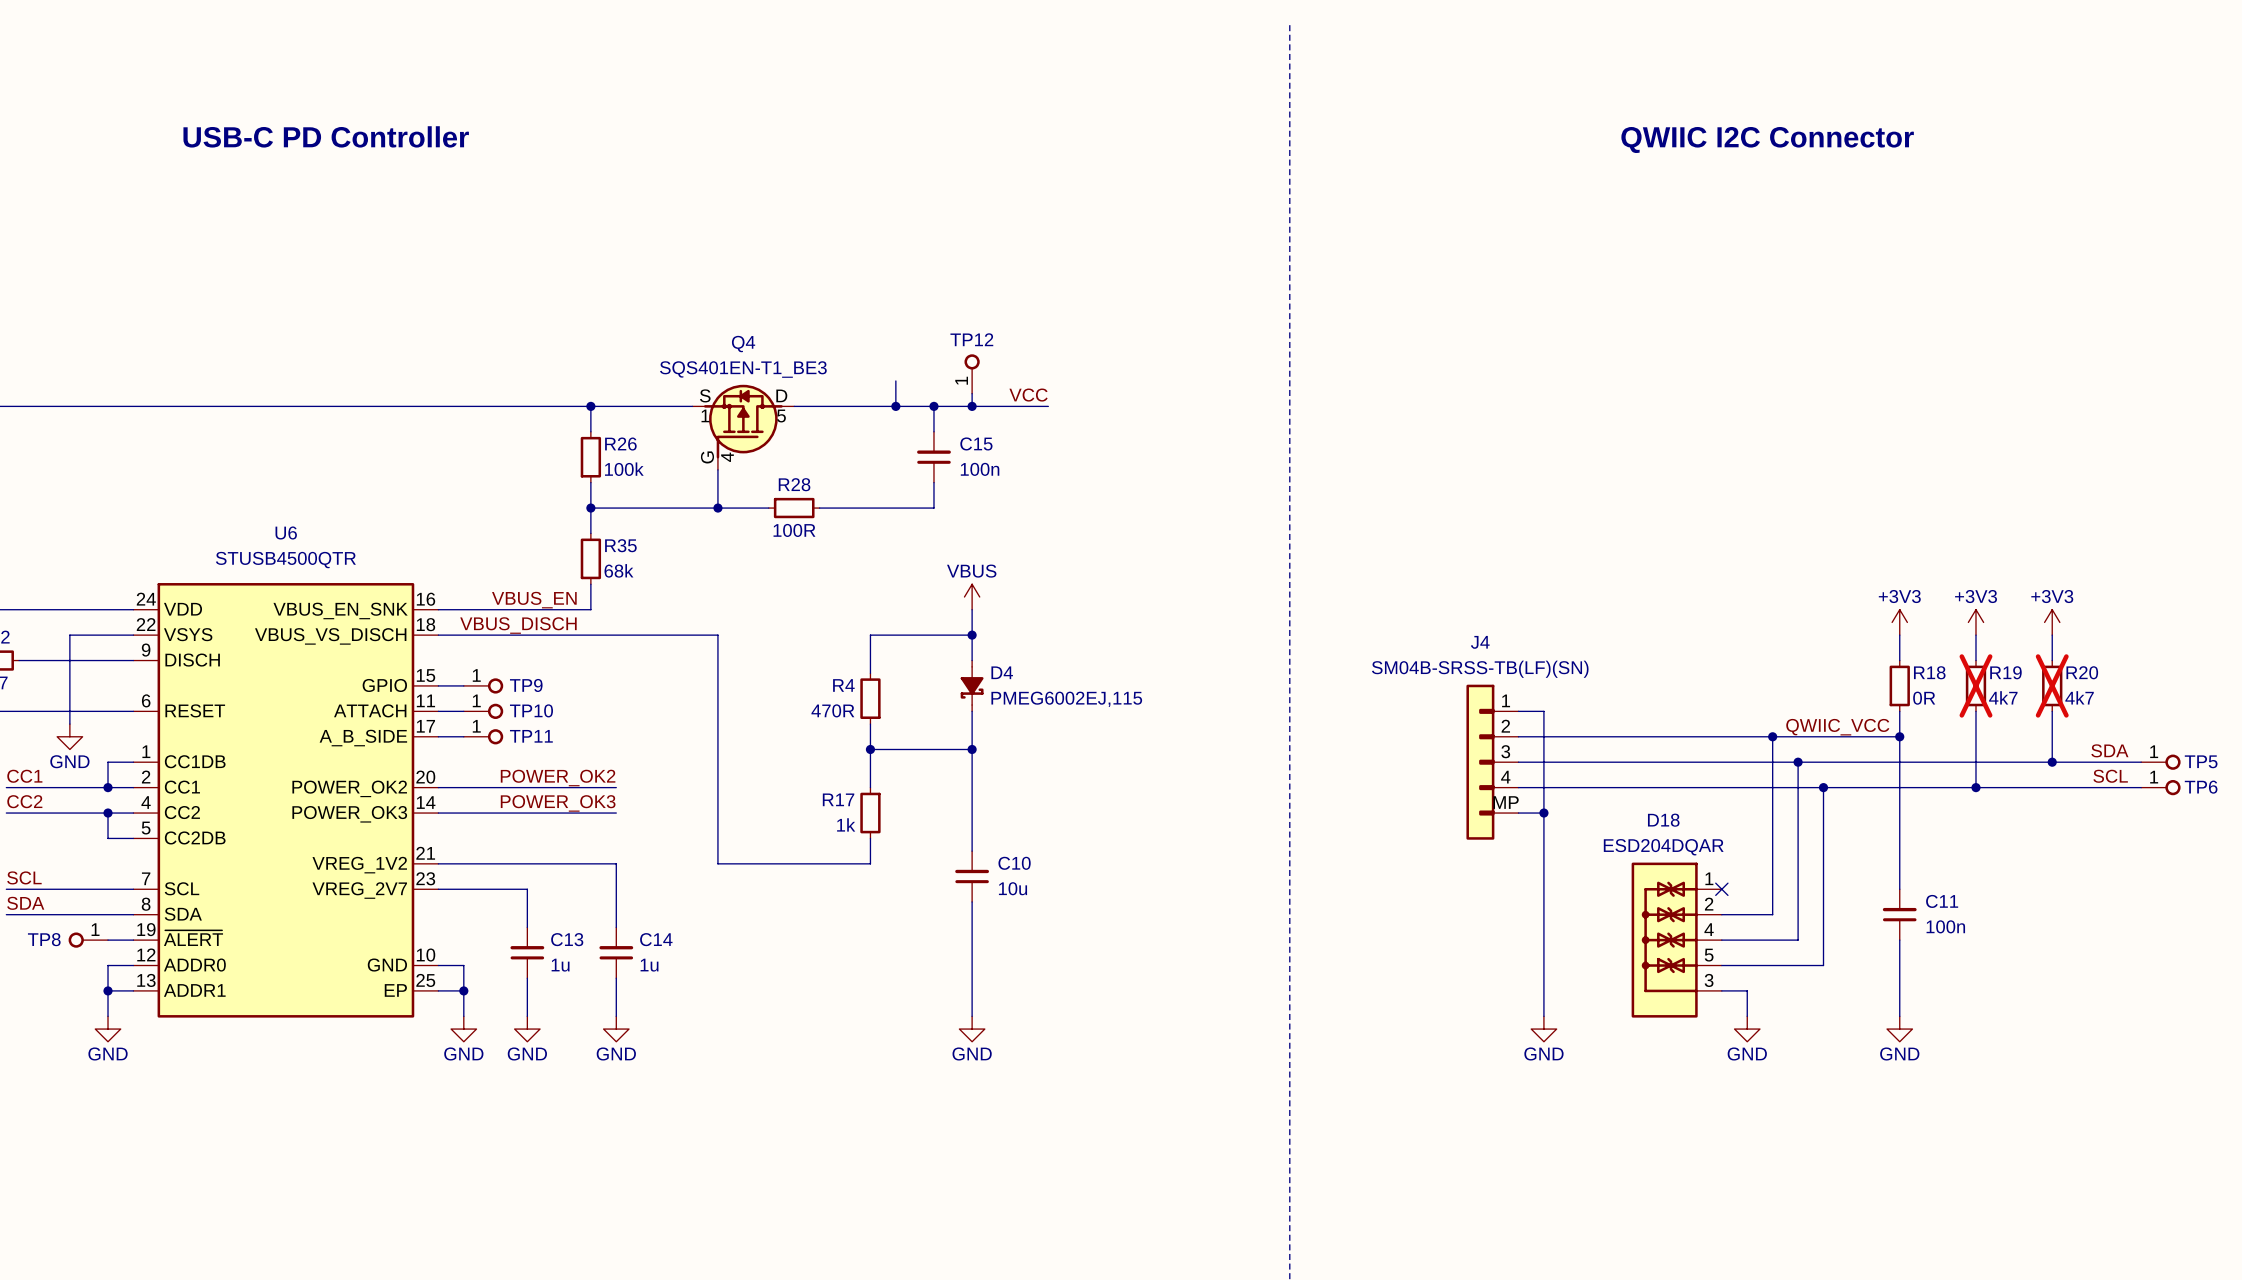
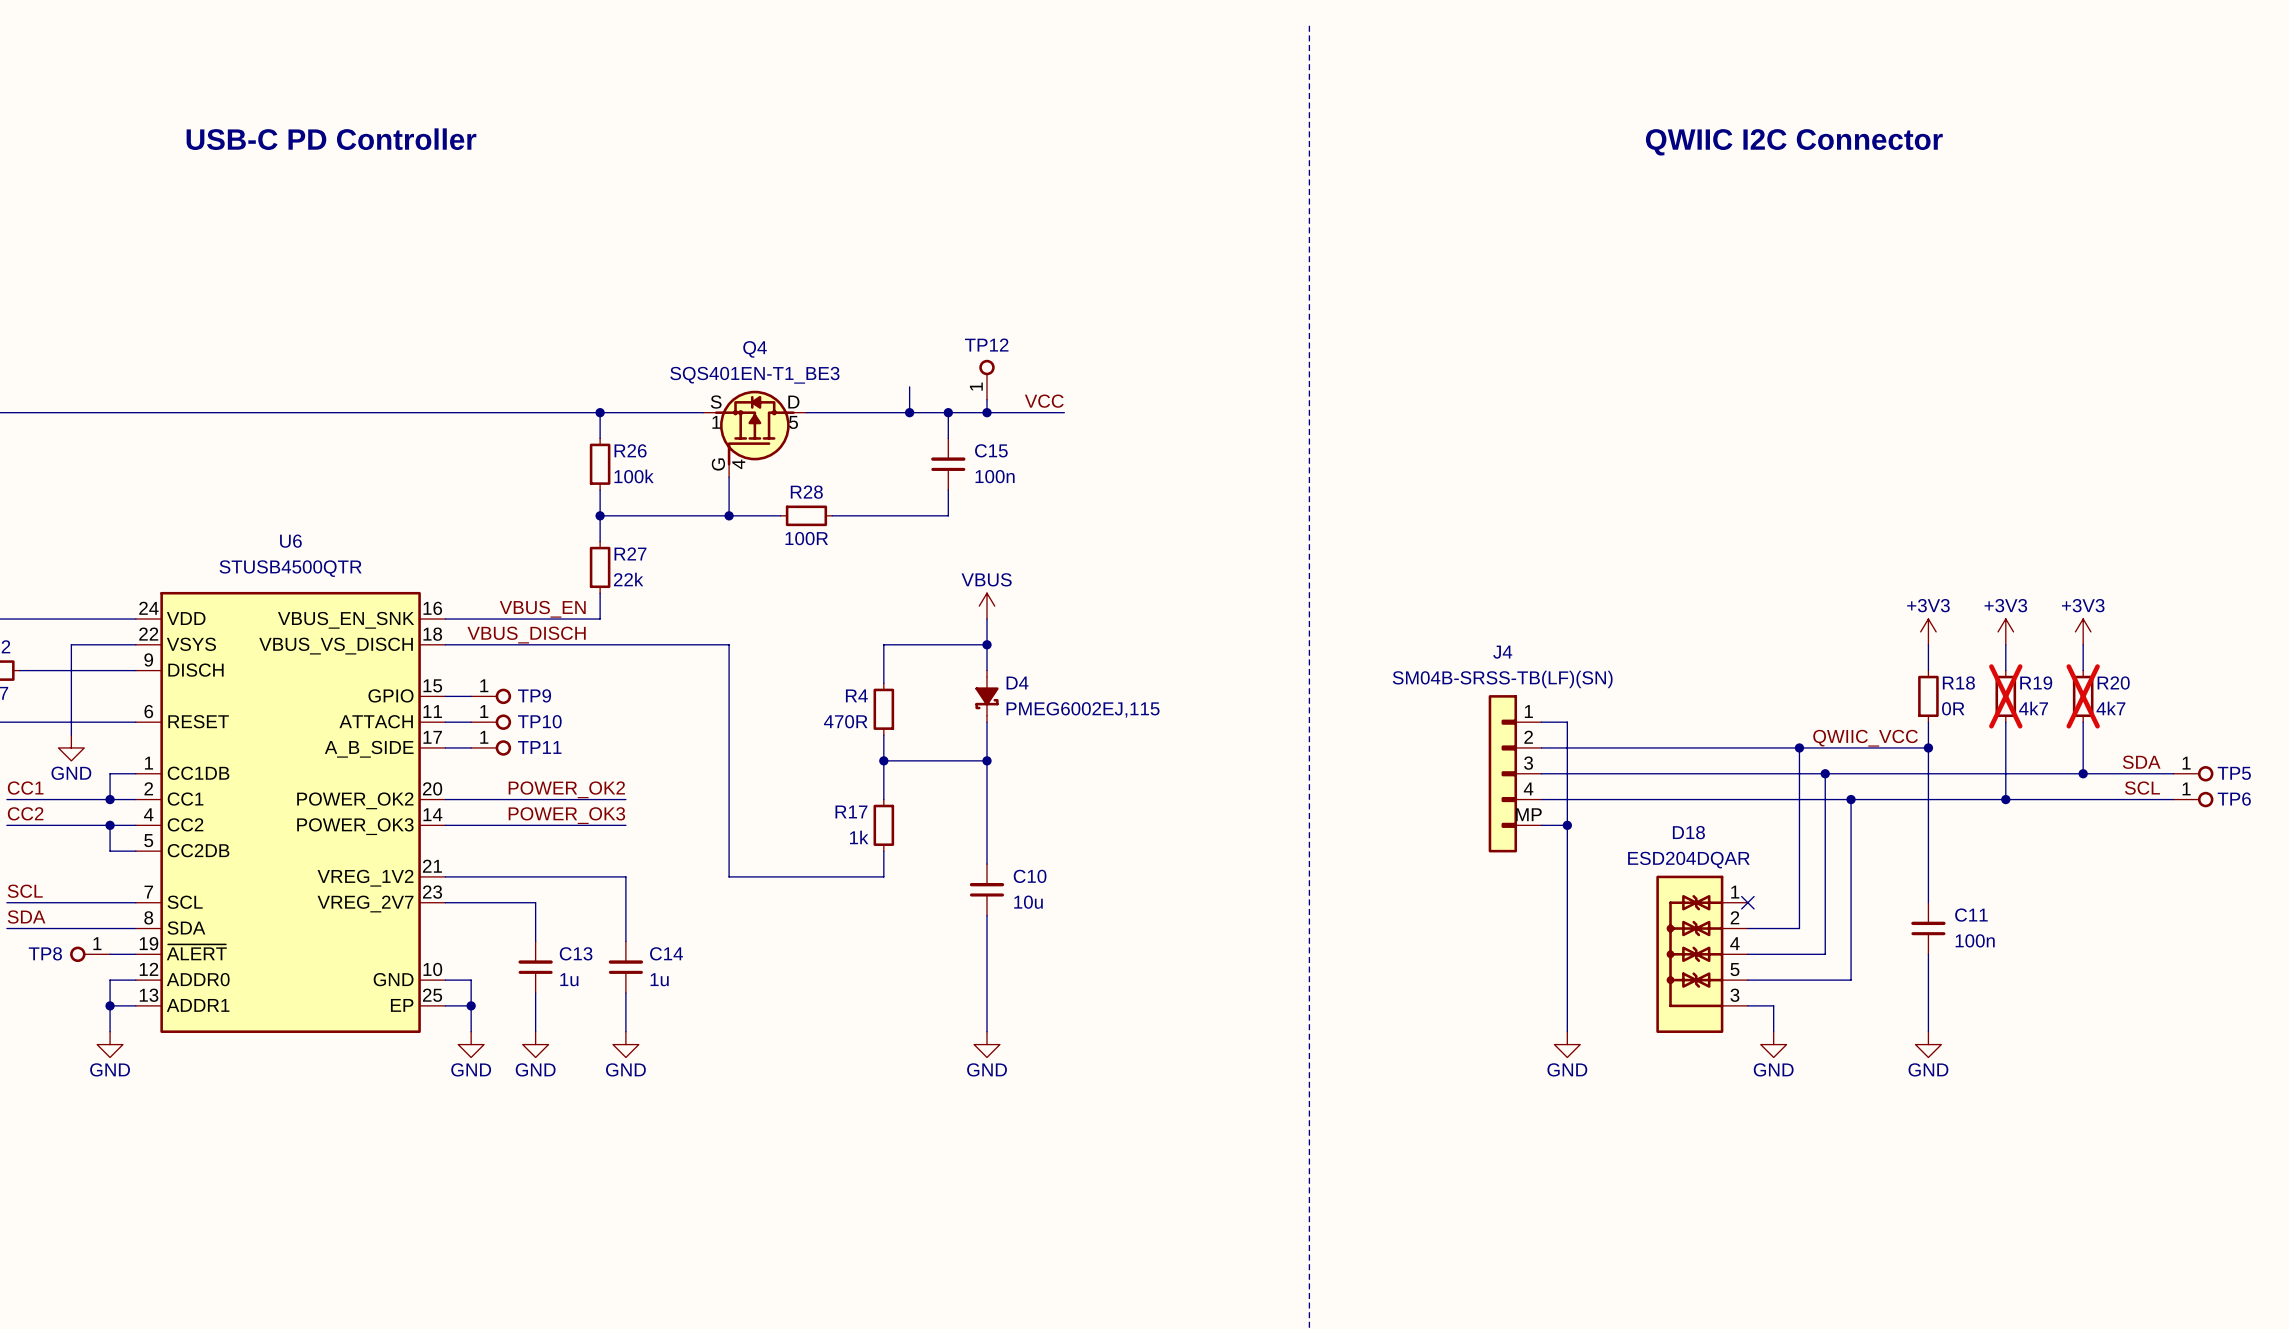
R35 name: R35 (620, 545) -> R27 (630, 553)
R35 text: 68k (618, 570) -> 22k (628, 579)

